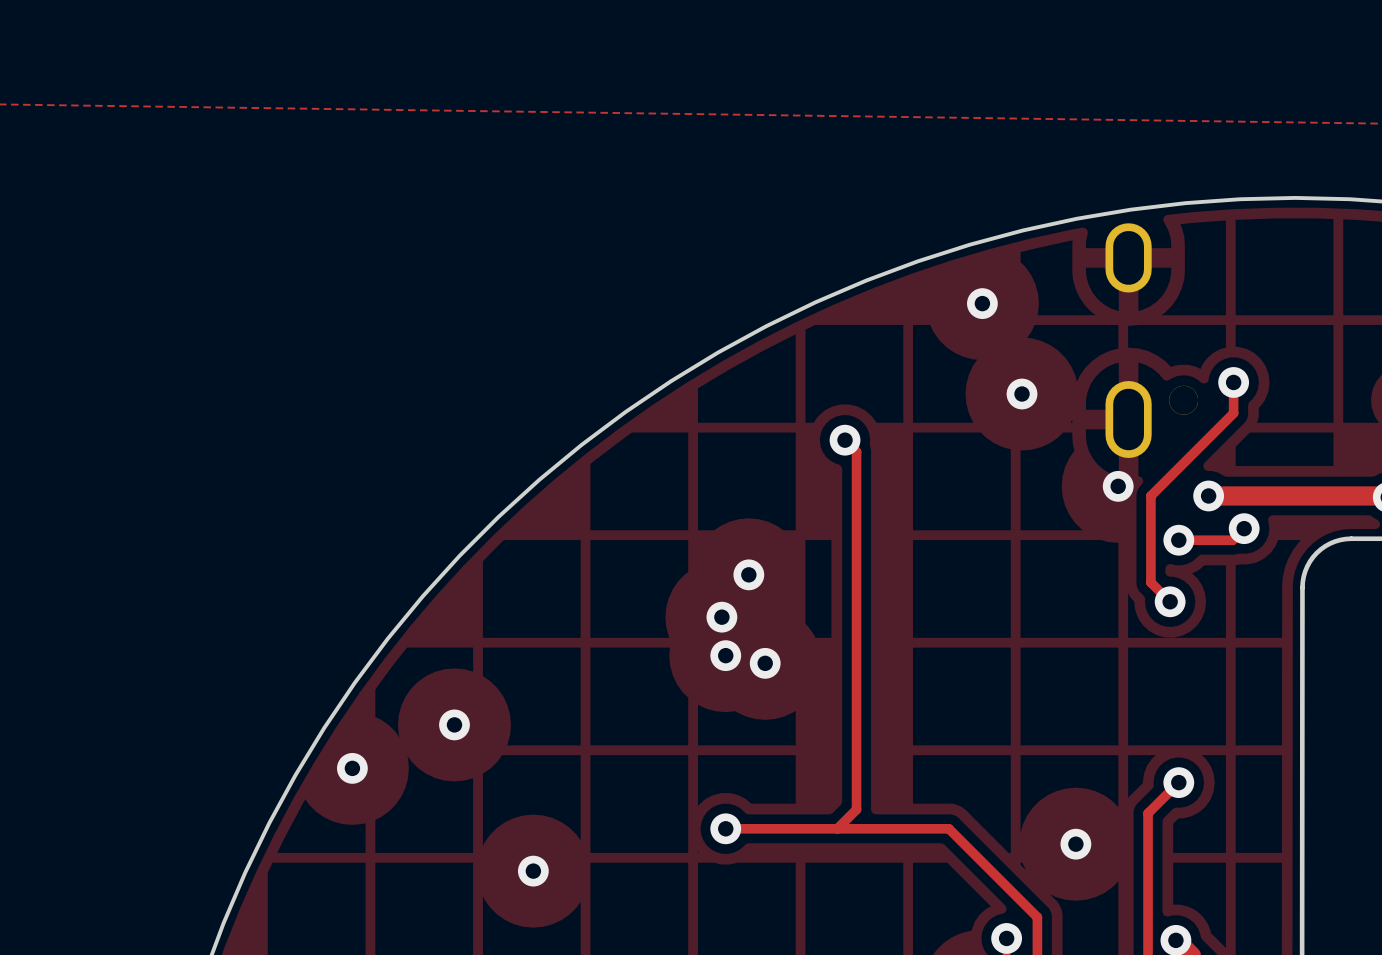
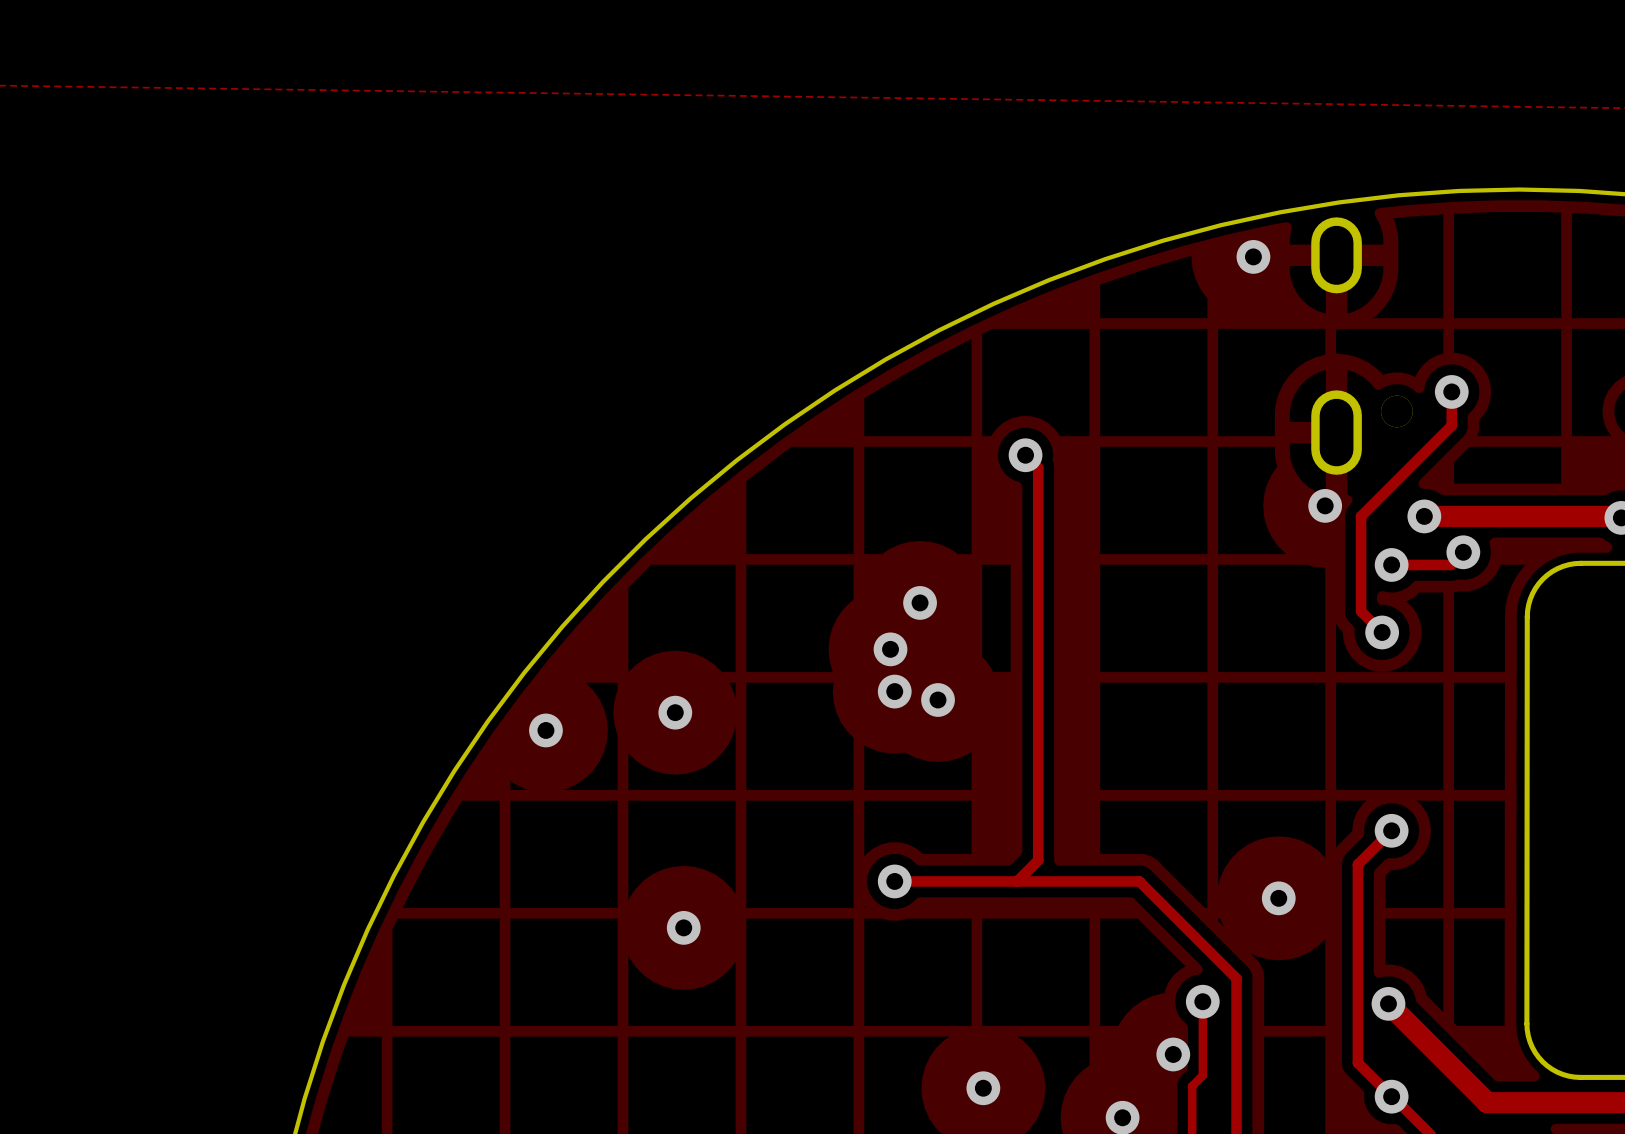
via: none -> (1253, 256)
via: (982, 303) -> none
via: (1022, 394) -> none
via: none -> (675, 712)
via: none -> (545, 730)
via: (454, 724) -> none
via: (352, 768) -> none

